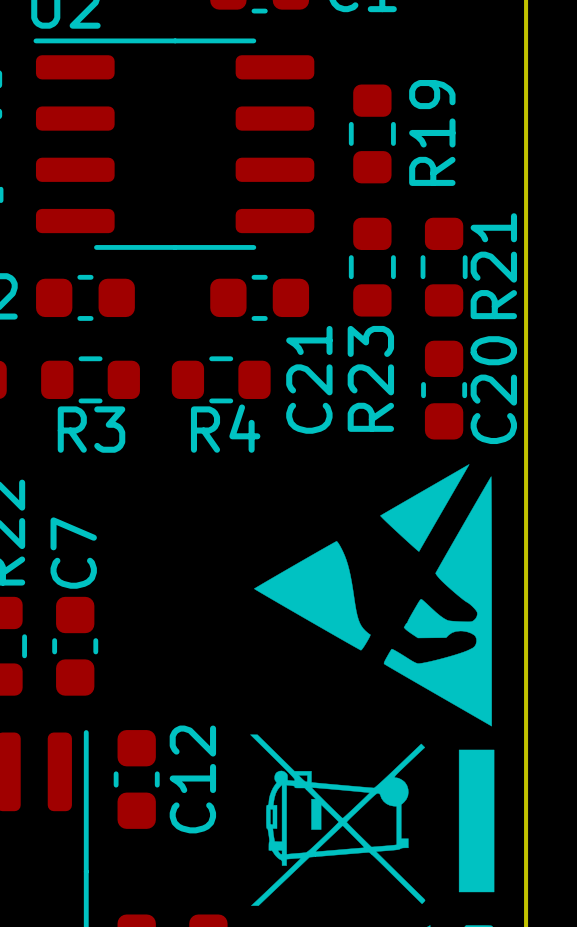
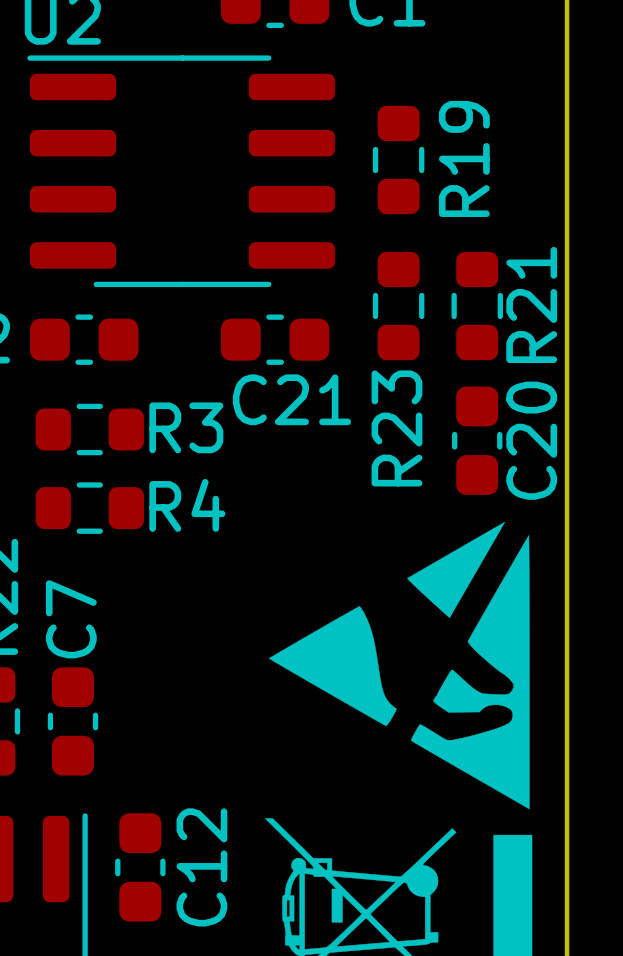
R4 position: (221, 379) -> (89, 508)
C21 name rotation: 0° (309, 379) -> 90° clockwise (291, 399)
R4 name position: R4 (225, 428) -> R4 (187, 505)
R3 name position: R3 (91, 429) -> R3 (186, 427)

